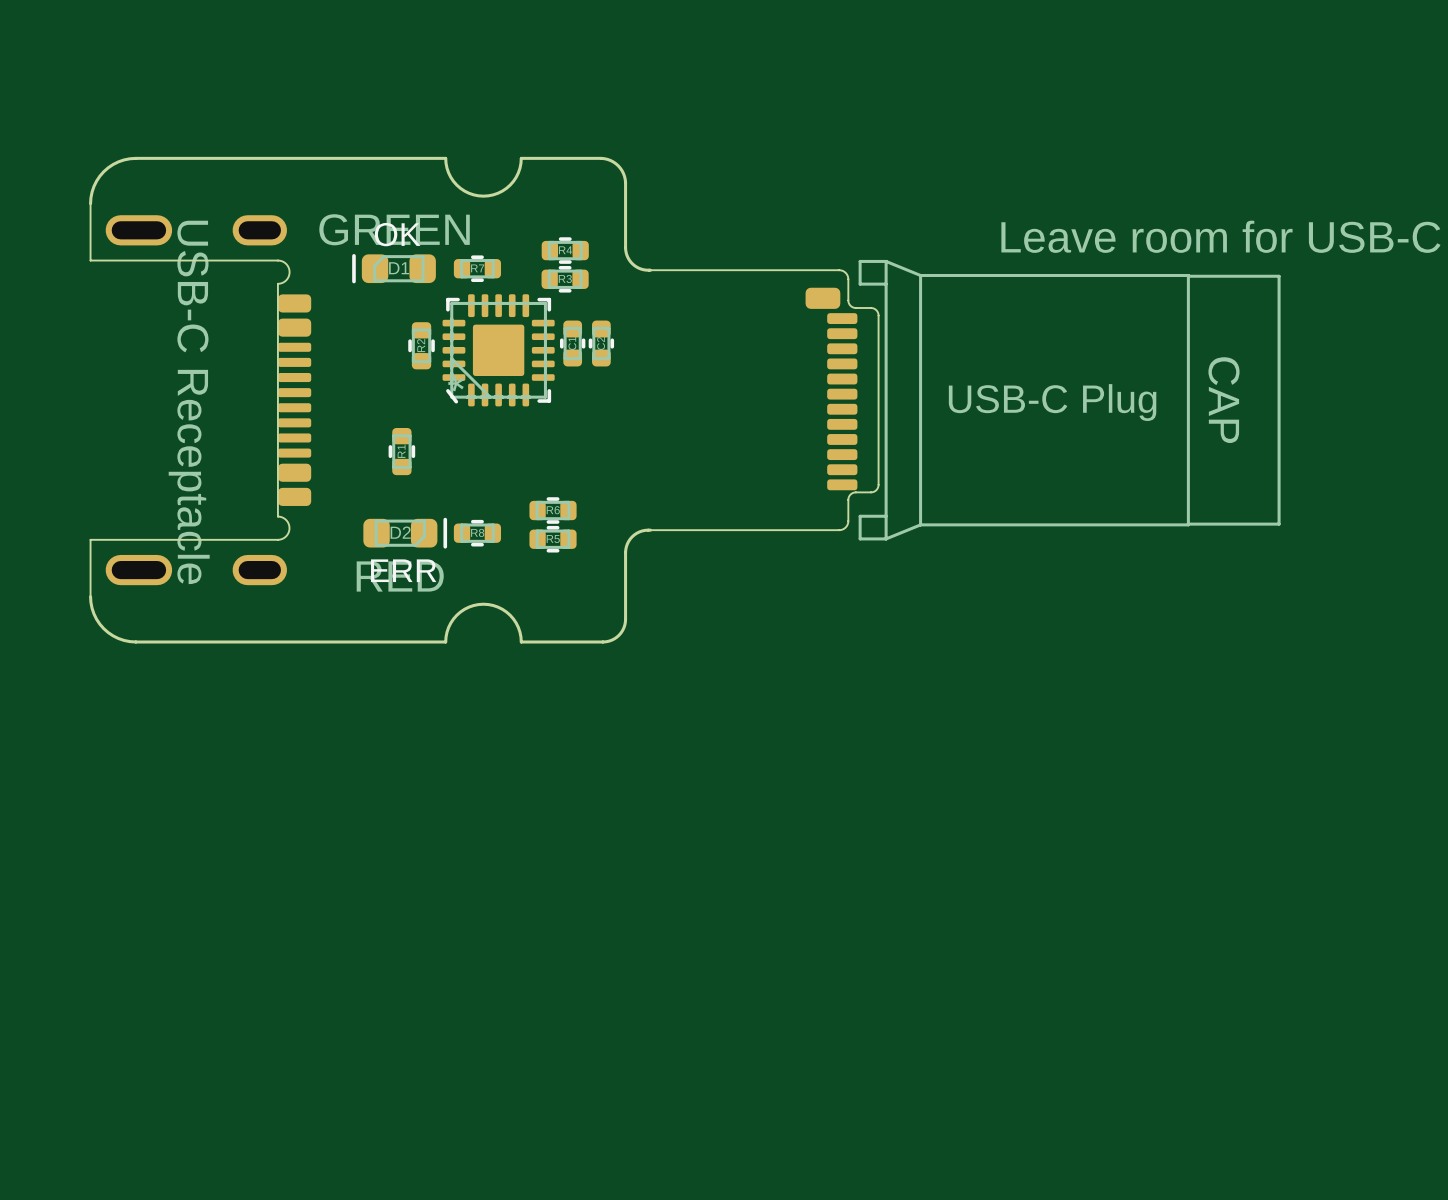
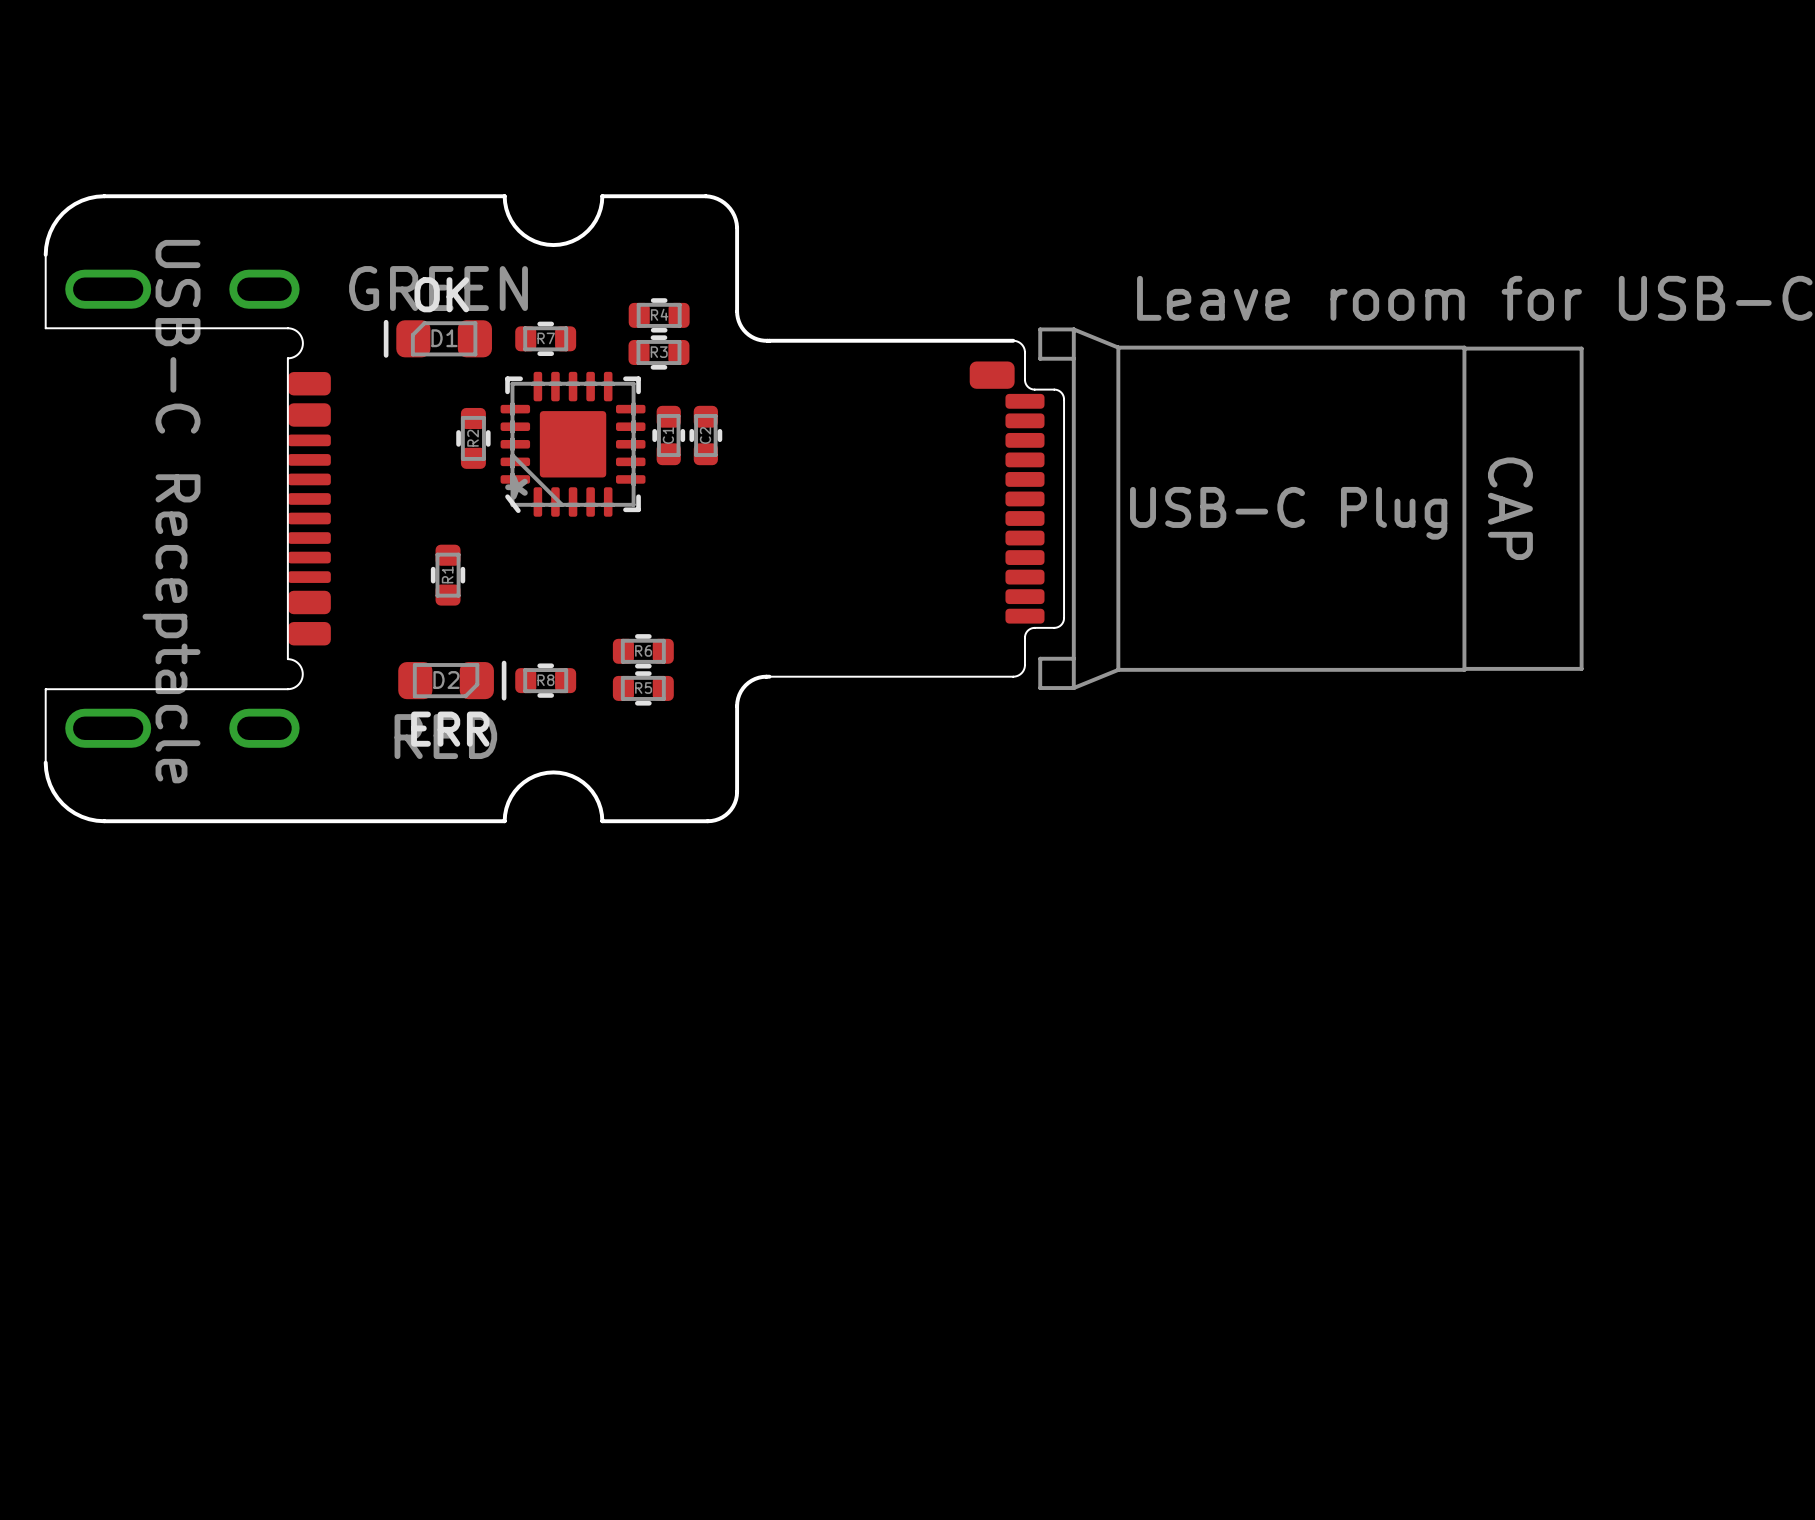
part footprint: [649, 259, 1281, 541] -> [767, 327, 1584, 690]

